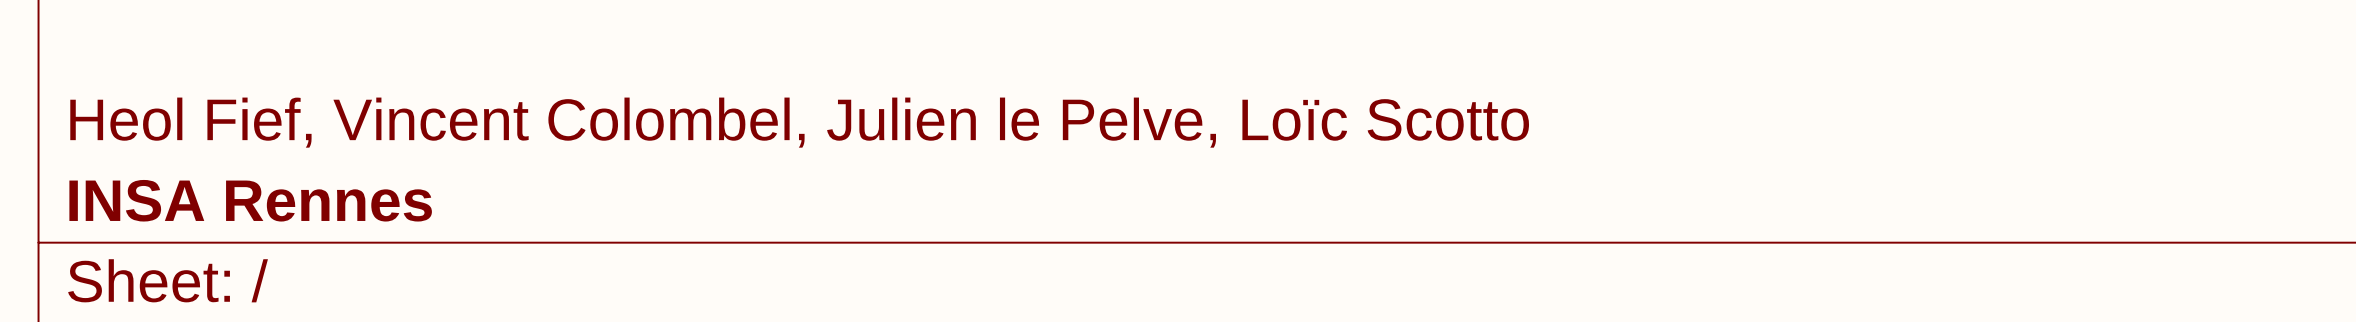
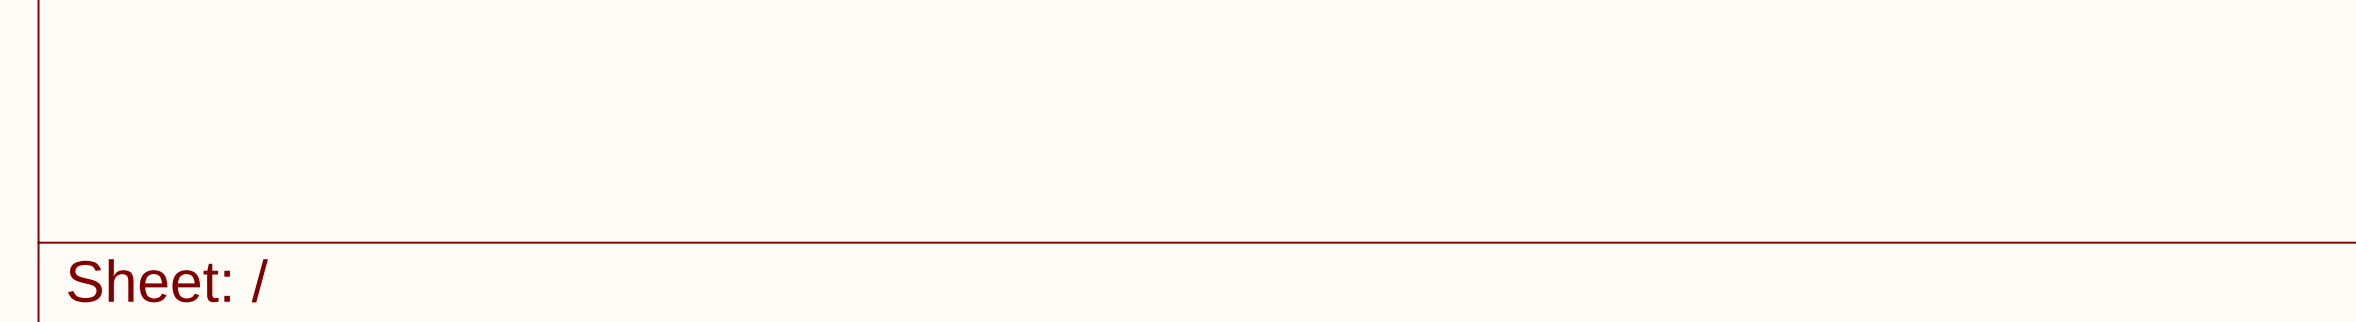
title block: Heol Fief, Vincent Colombel, Julien le Pelve, Loïc Scotto (799, 122) -> none
title block: INSA Rennes (250, 200) -> none

